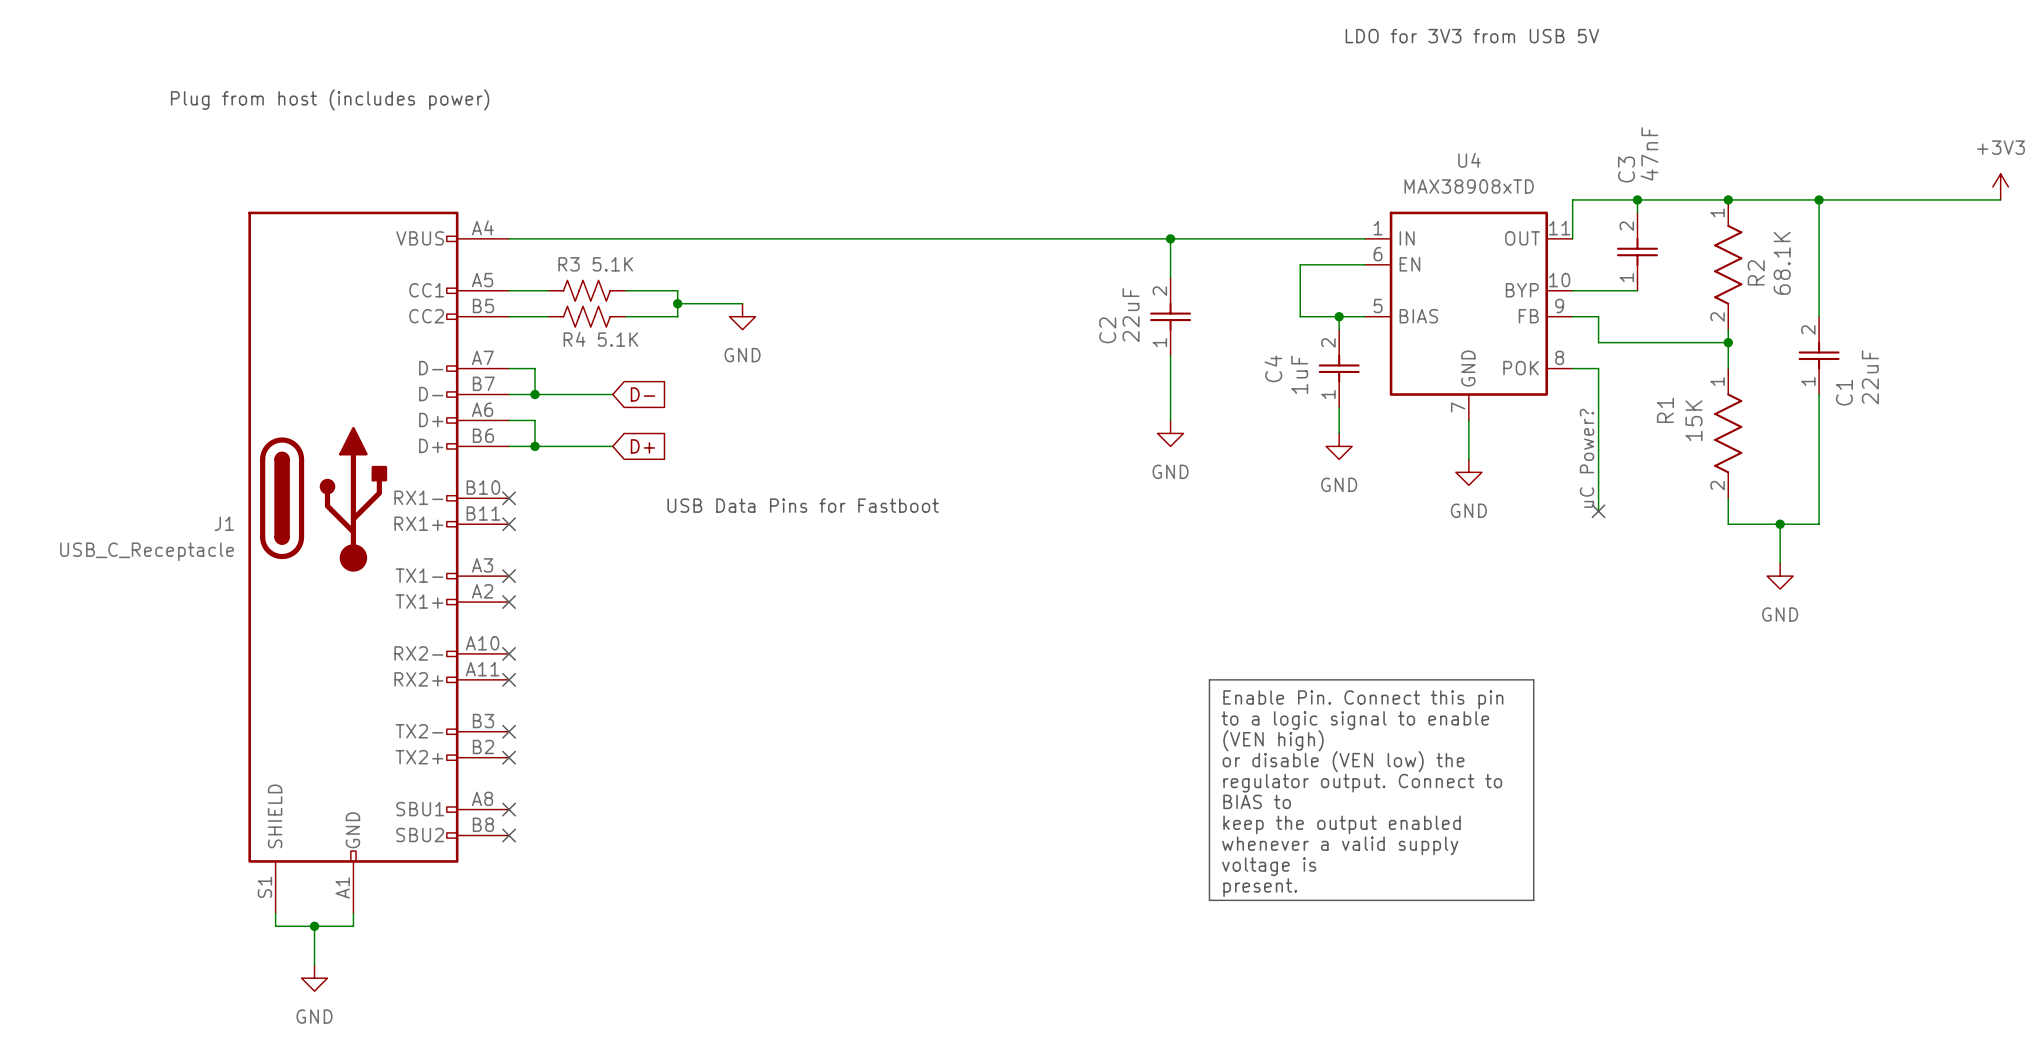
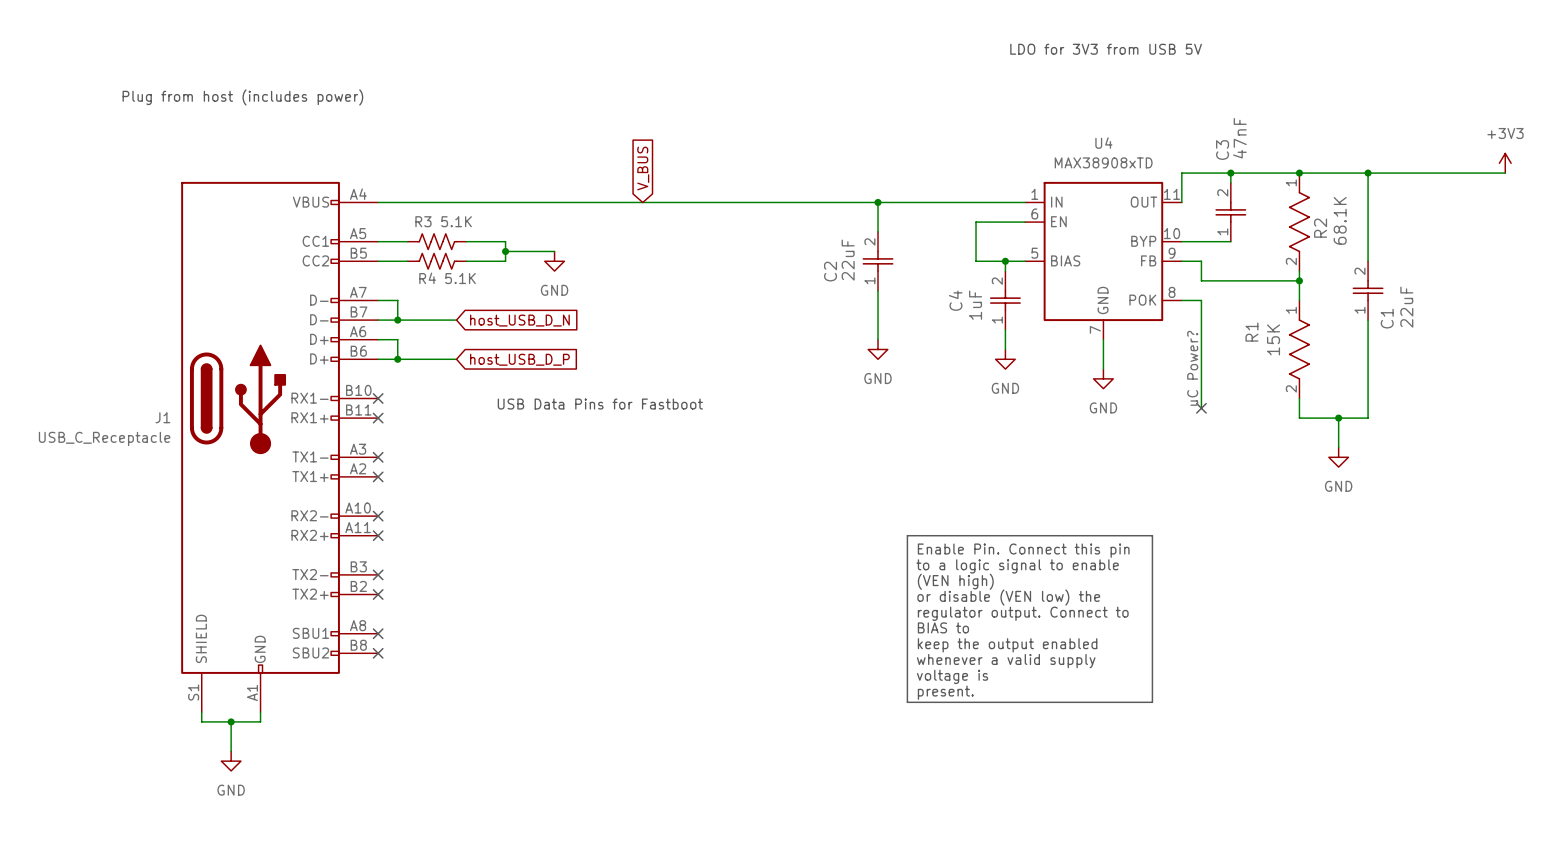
global label: none -> V_BUS (643, 168)
global label: D- (642, 394) -> host_USB_D_N (519, 320)
global label: D+ (642, 446) -> host_USB_D_P (519, 359)

